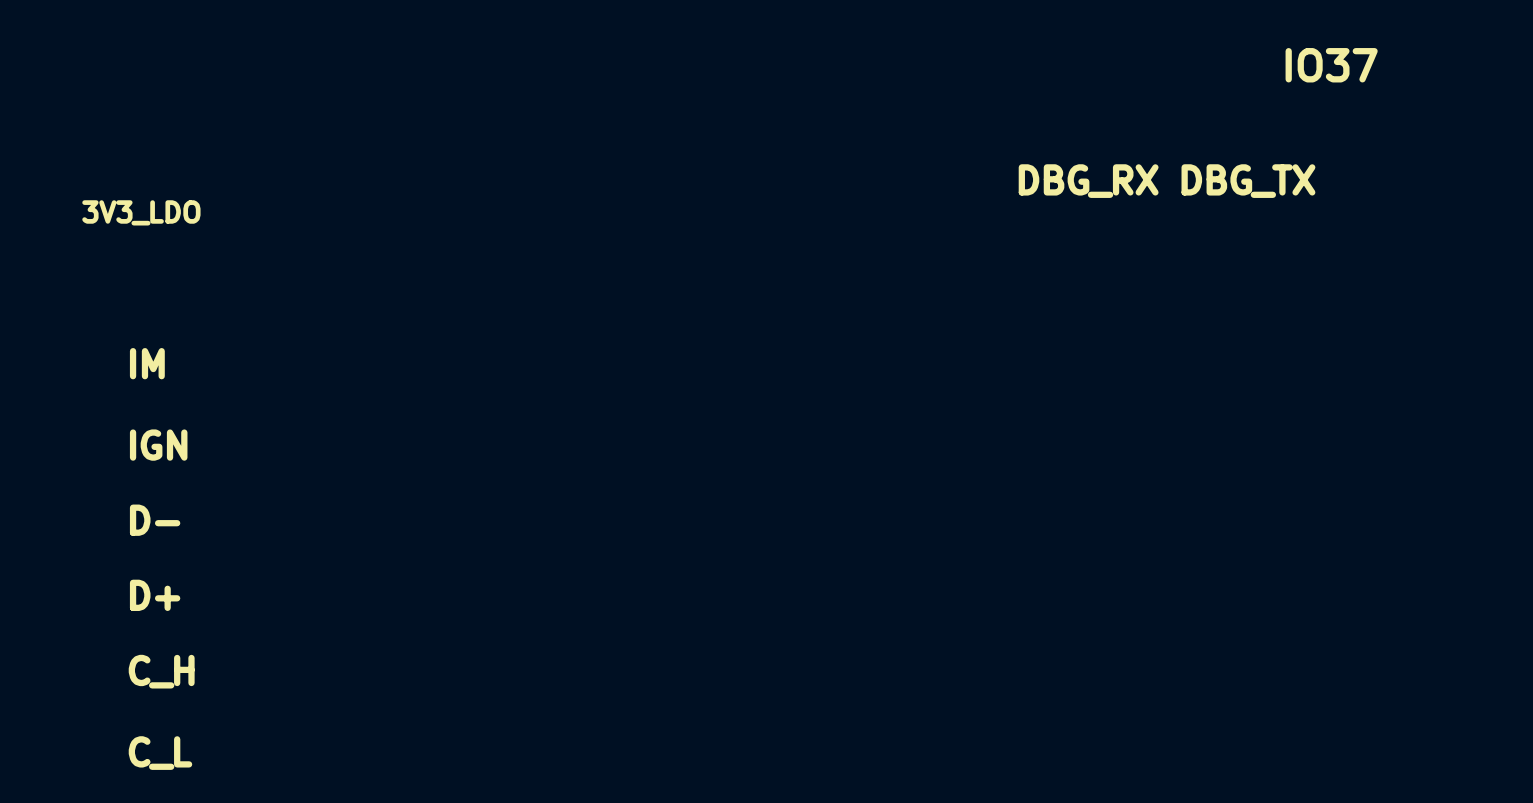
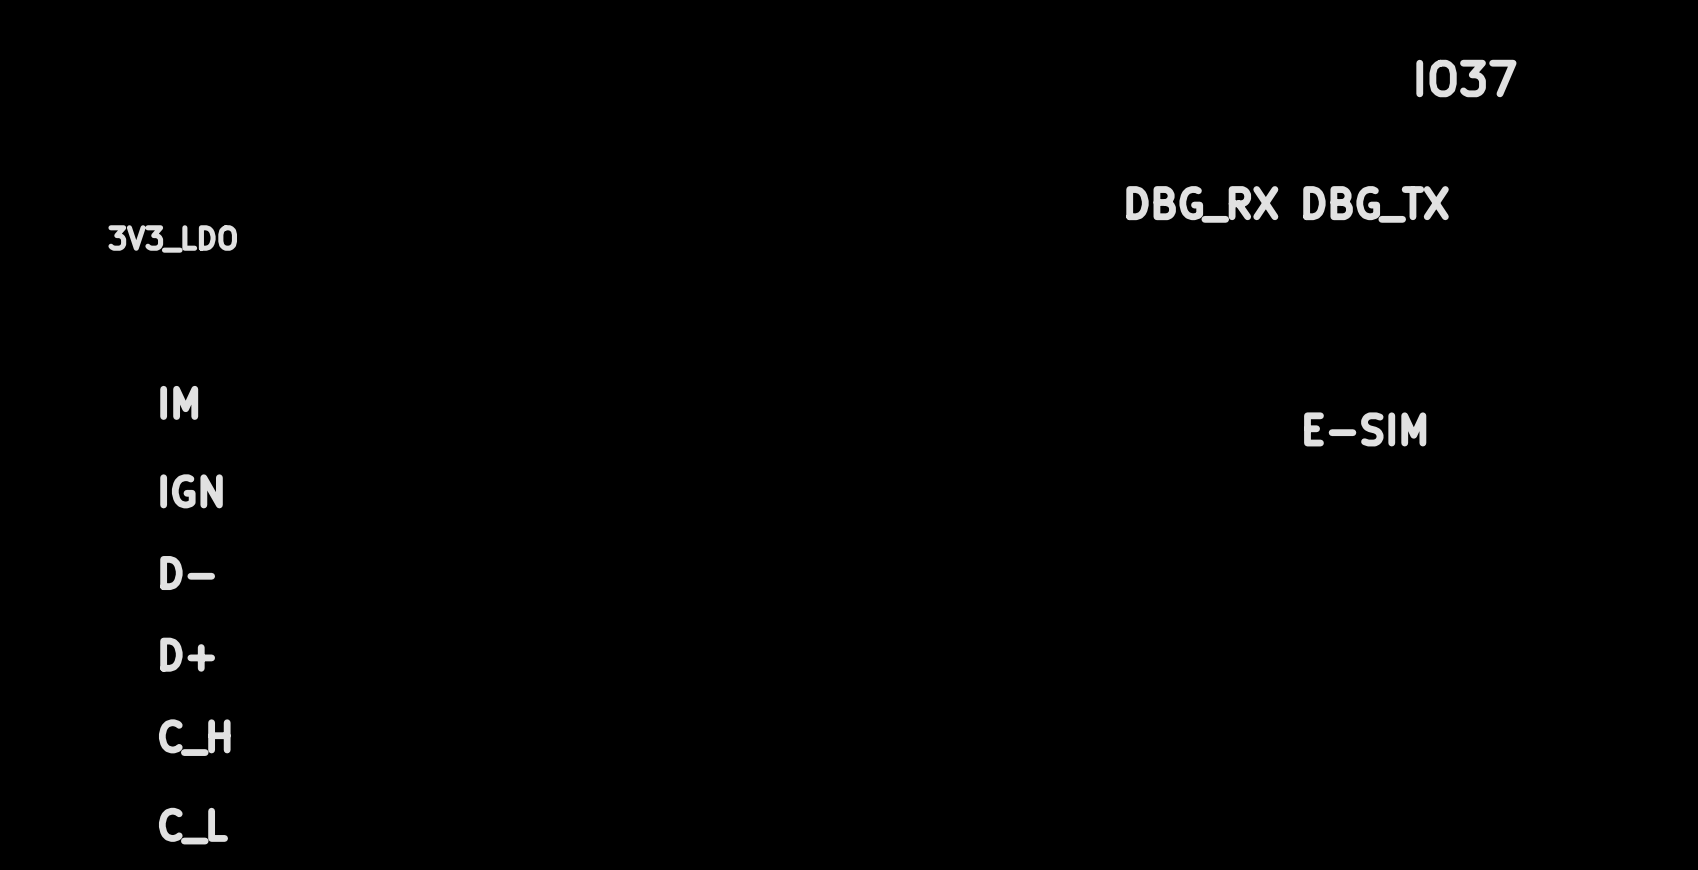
text: none -> E-SIM (1365, 429)

